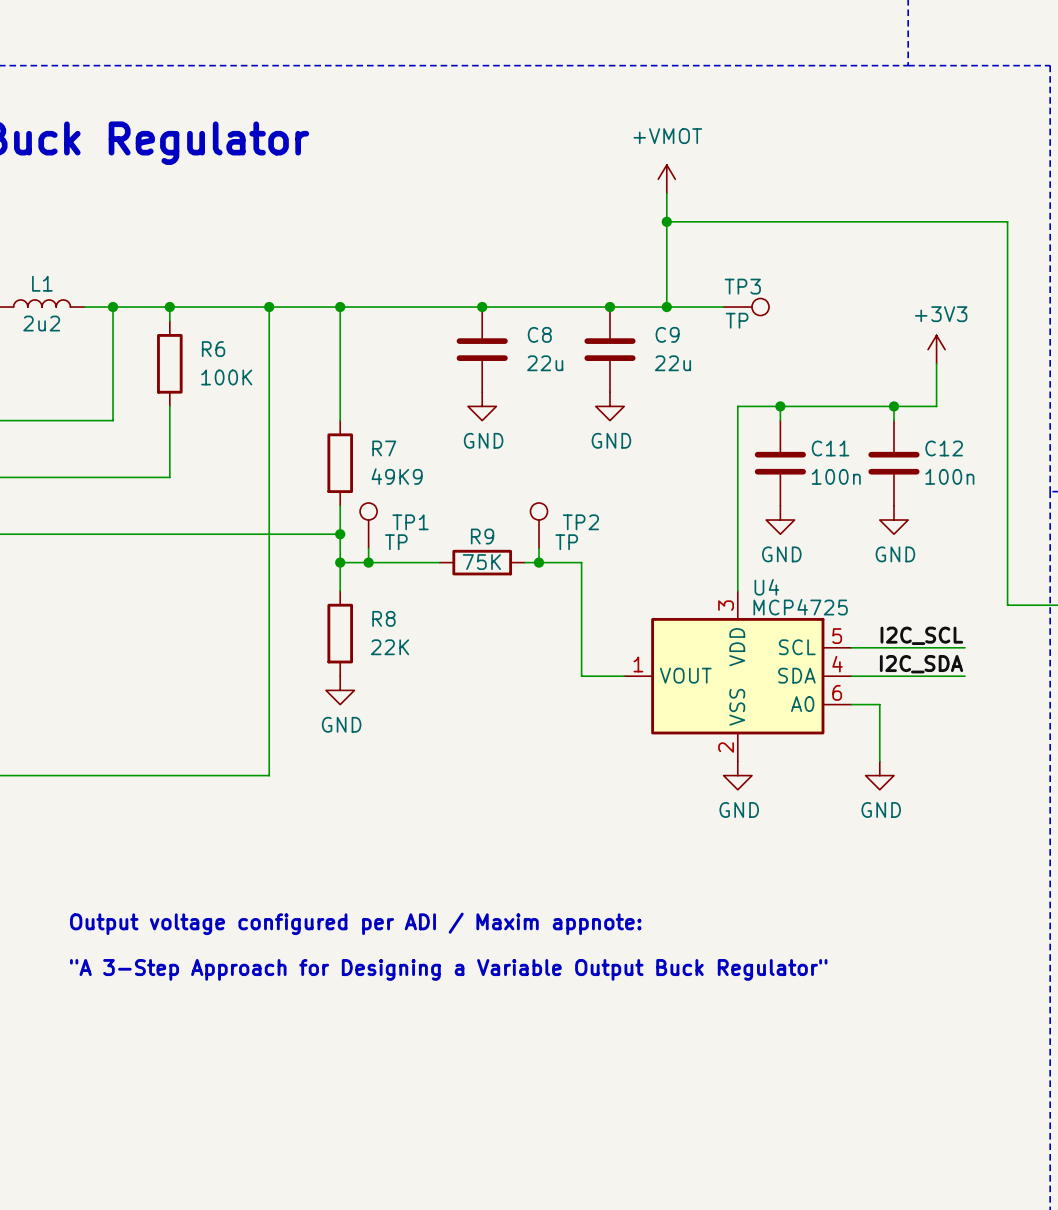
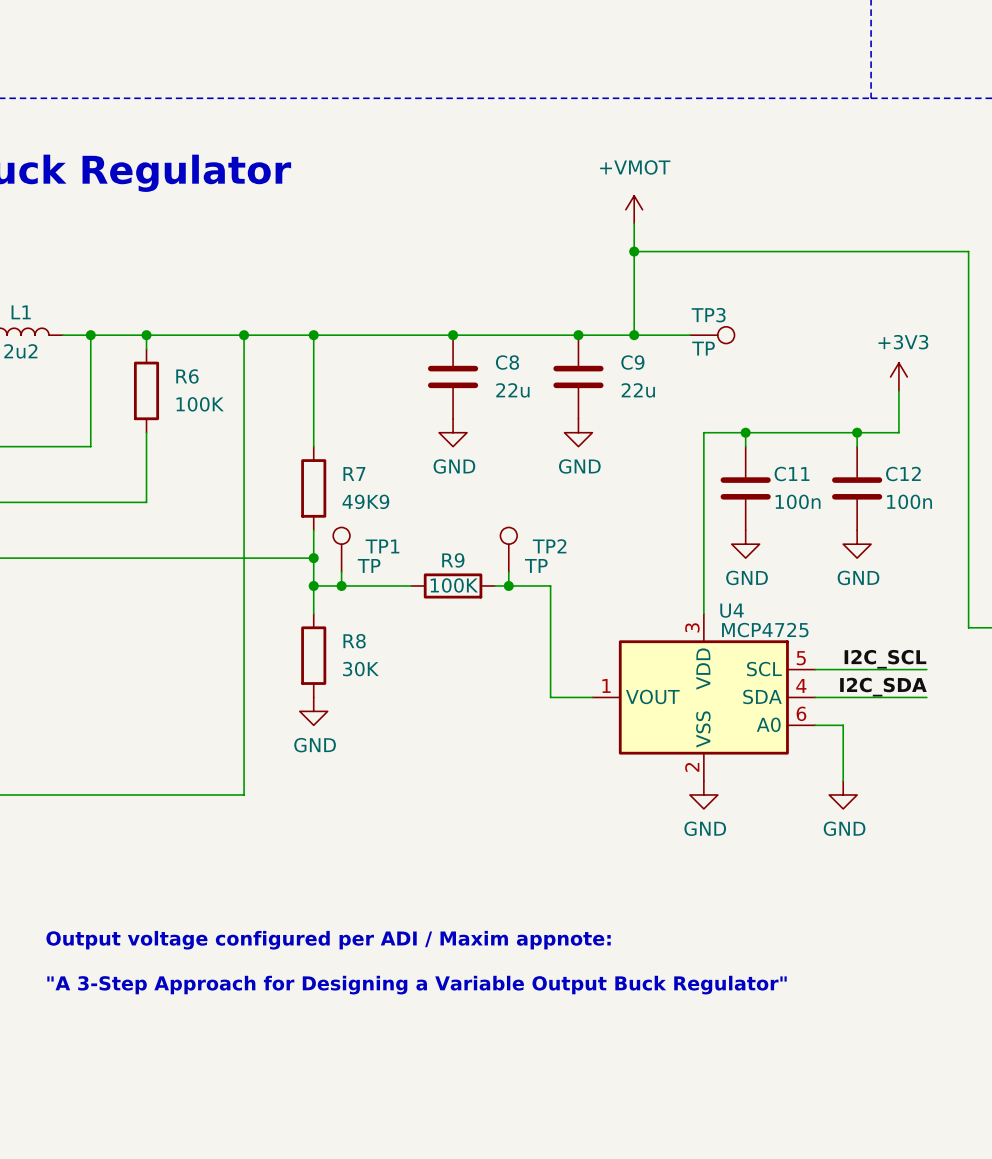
R9 value: 75K (481, 562) -> 100K (454, 585)
R8 value: 22K (390, 647) -> 30K (360, 669)

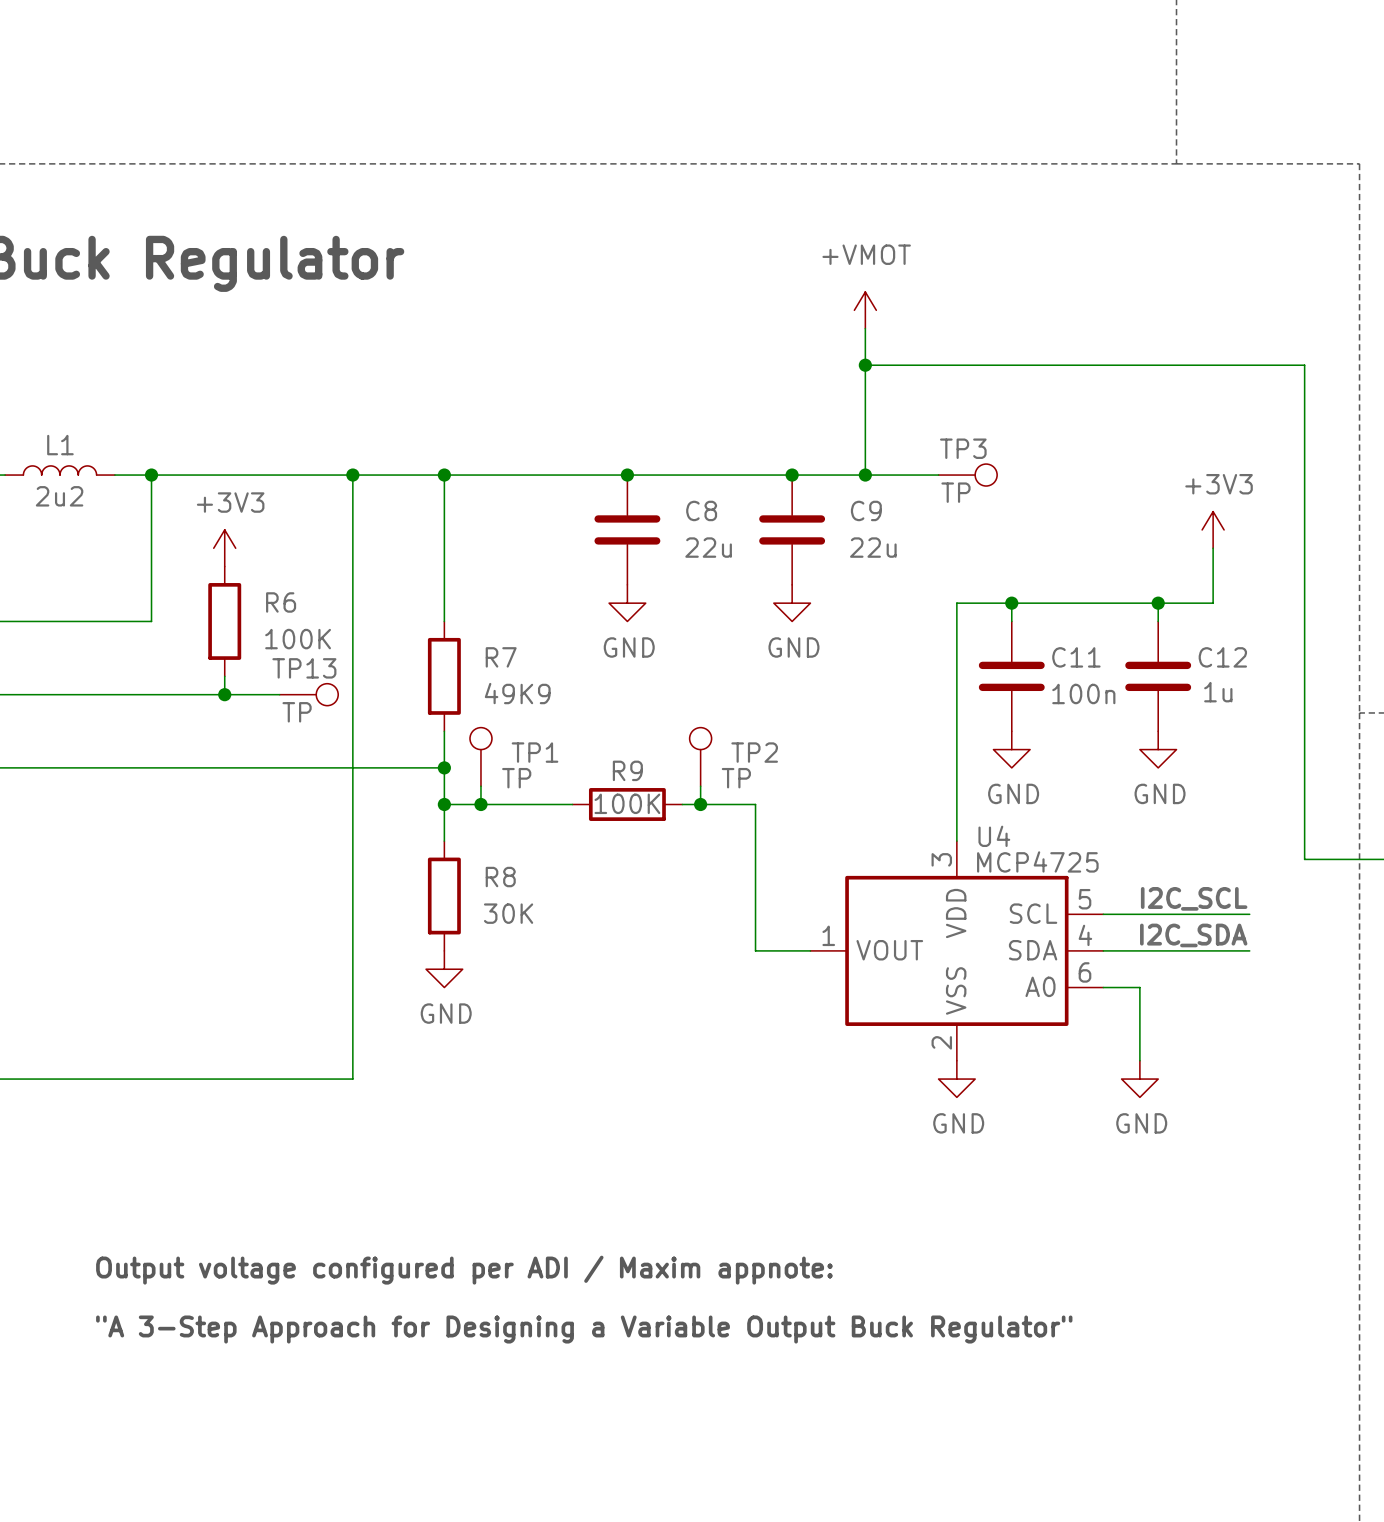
wire: (146, 335) (146, 349) -> none
junction: (146, 335) -> none
R6 position: (146, 390) -> (224, 621)
power symbol: none -> +3V3 (224, 548)
wire: (146, 432) (146, 488) -> none
C12 value: 100n (909, 501) -> 1u (1218, 692)
wire: none -> (224, 694) (279, 694)
junction: none -> (224, 694)
TP13: none -> TP (308, 694)

